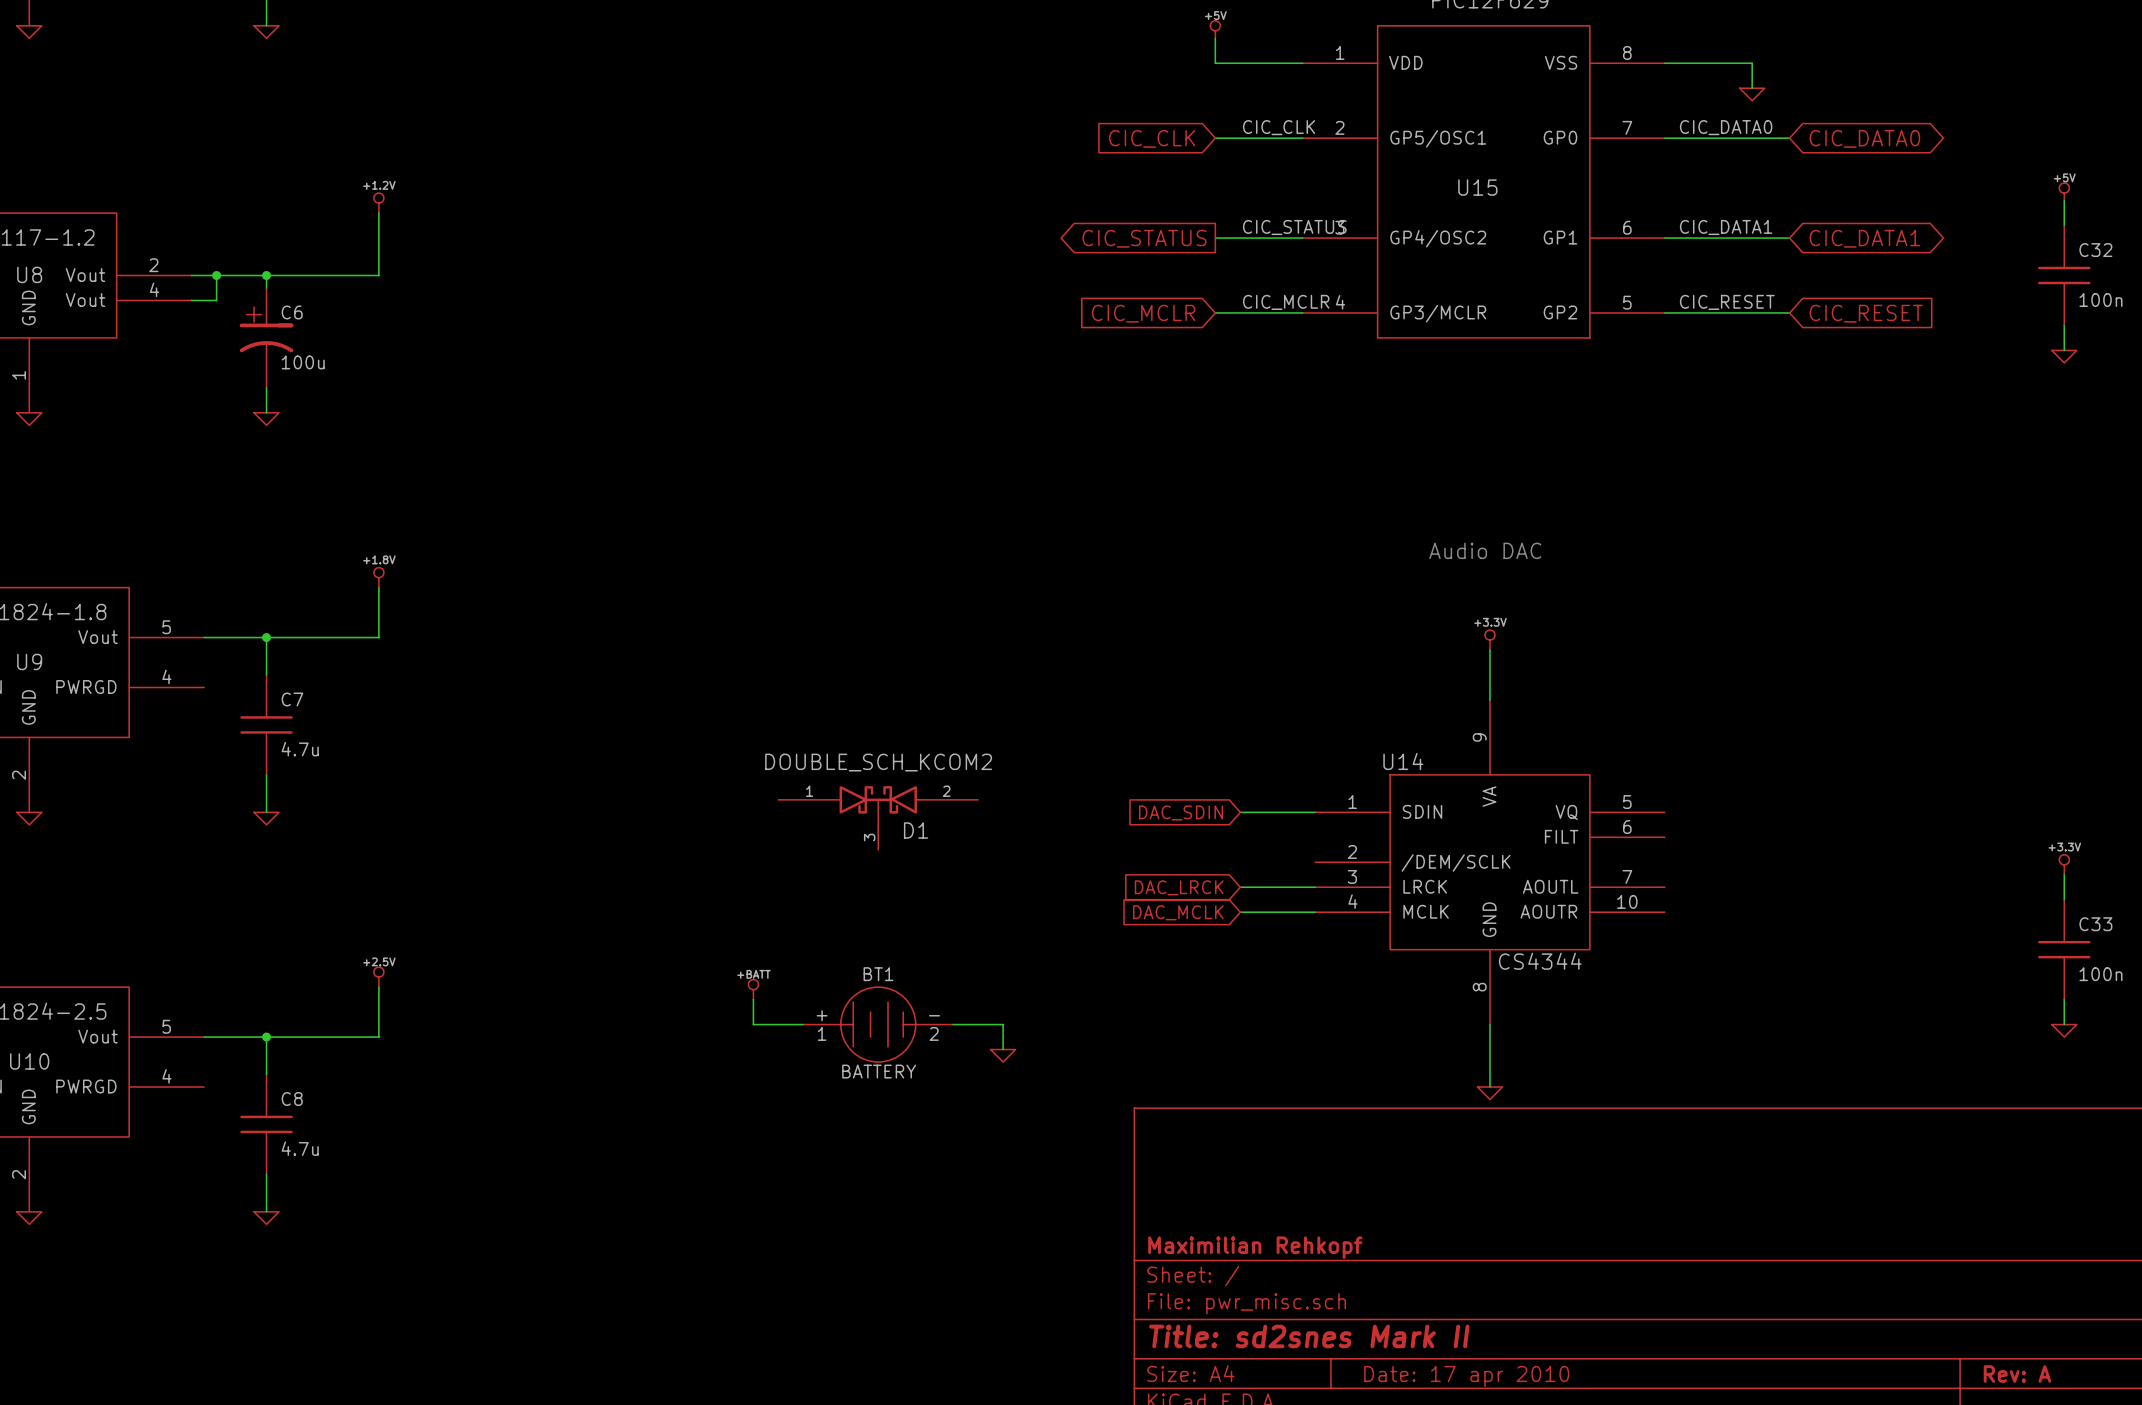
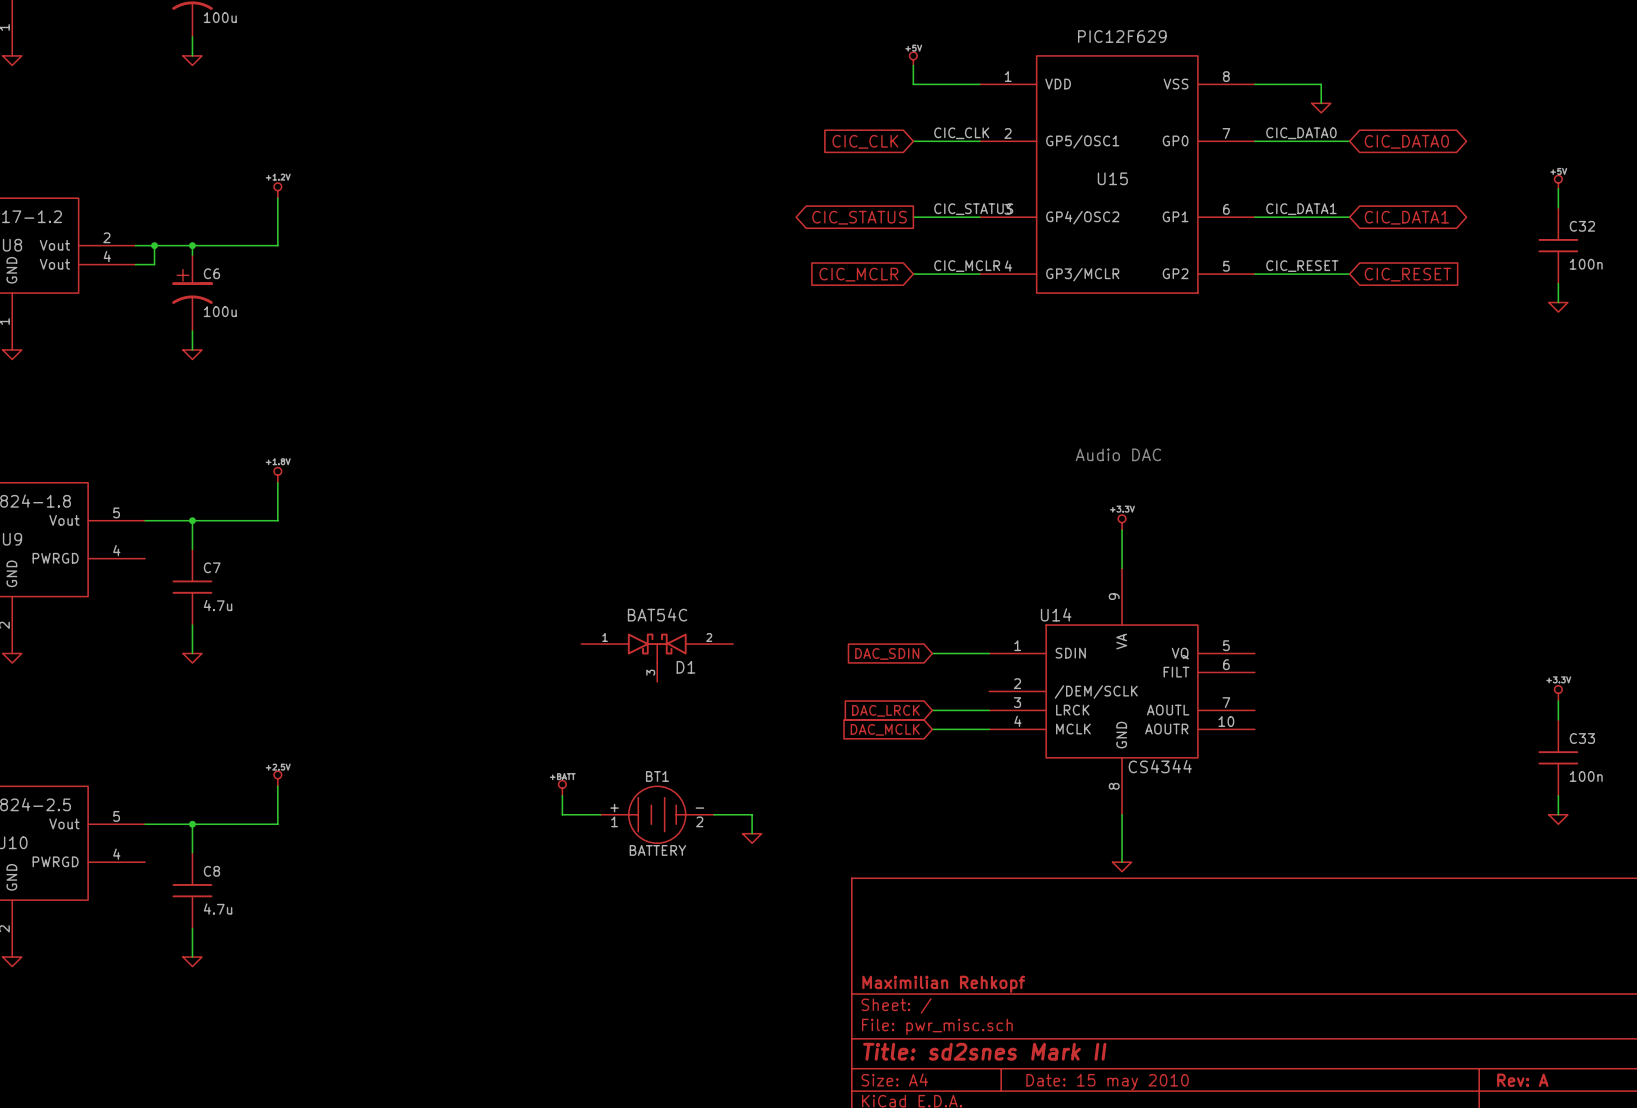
D1 value: DOUBLE_SCH_KCOM2 (878, 762) -> BAT54C (657, 614)
title block: Date: 17 apr 2010 (1466, 1376) -> Date: 15 may 2010 (1107, 1082)

